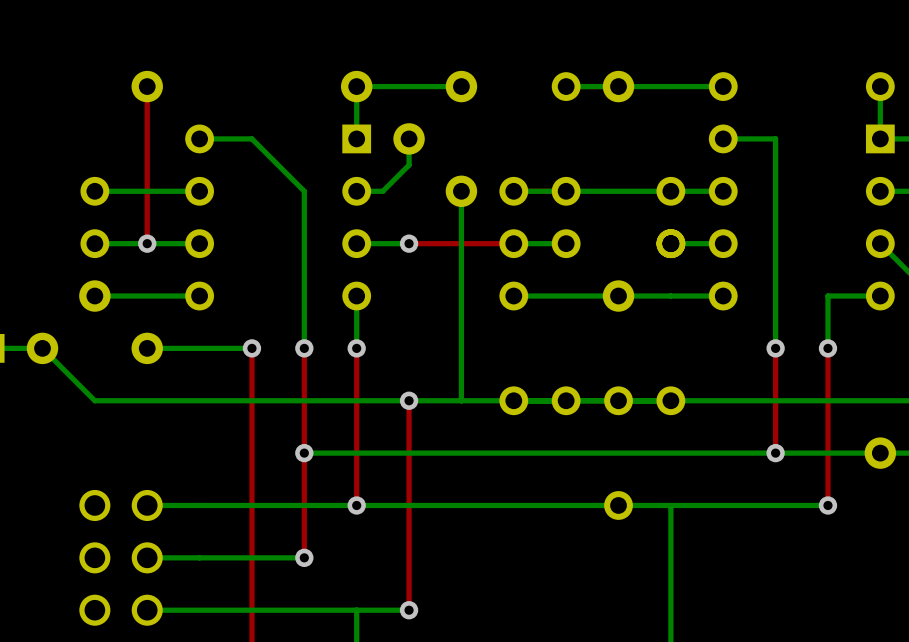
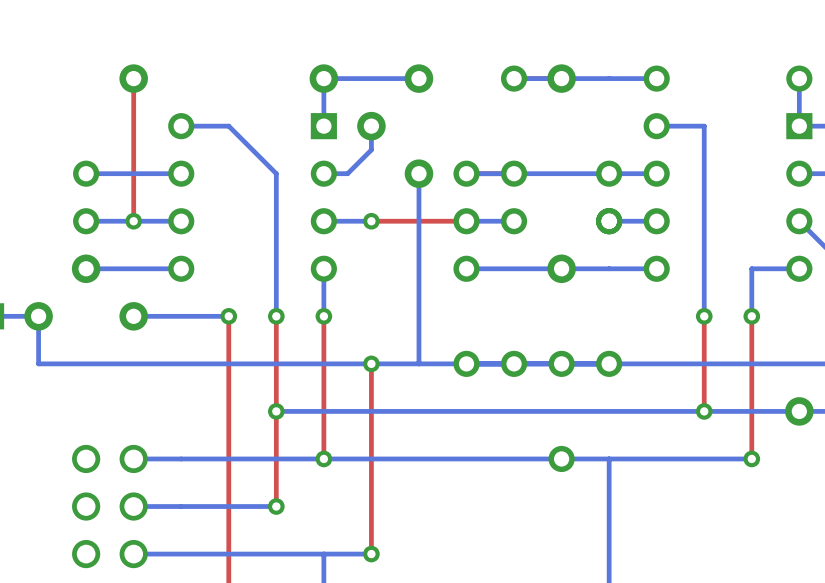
bottom track: (42, 348) (94, 400) -> (38, 316) (38, 363) (86, 363)

